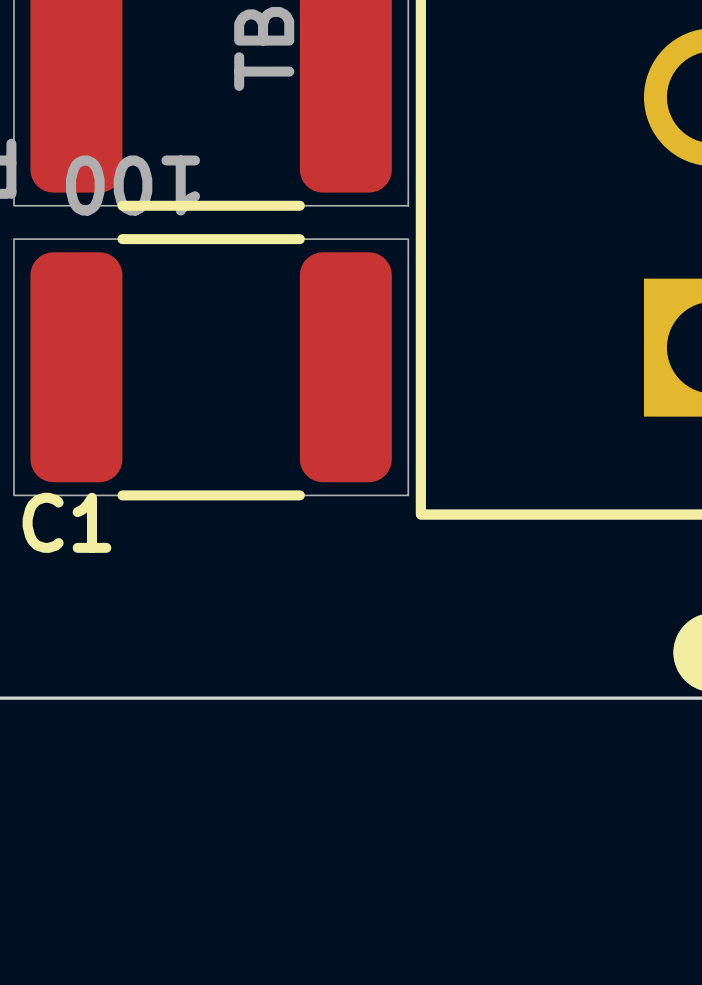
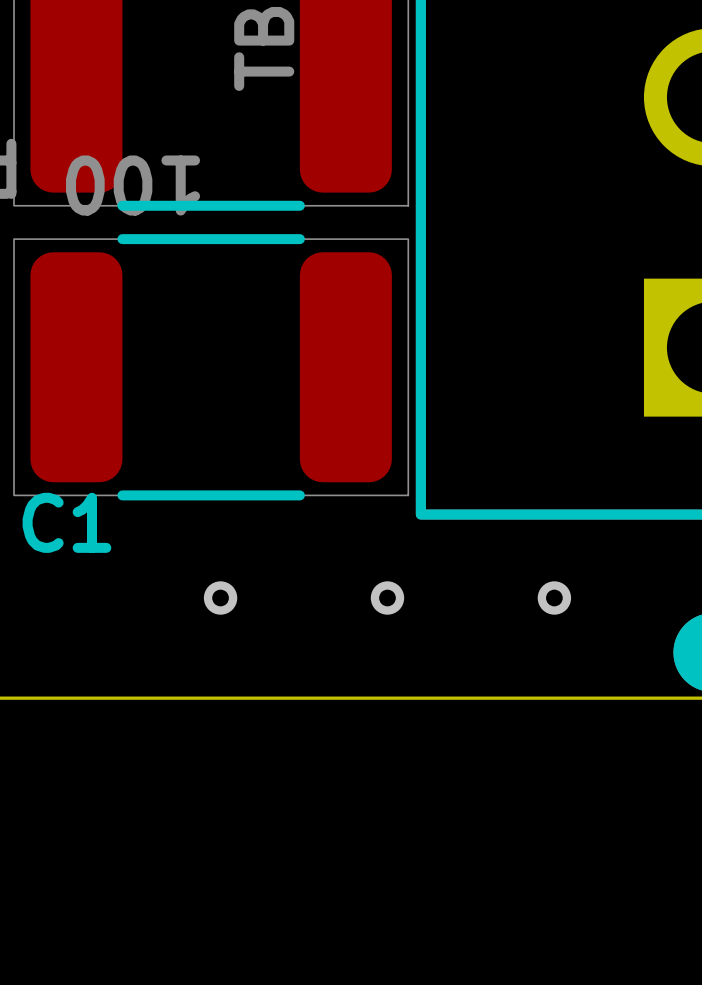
via: none -> (220, 598)
via: none -> (387, 598)
via: none -> (554, 598)

